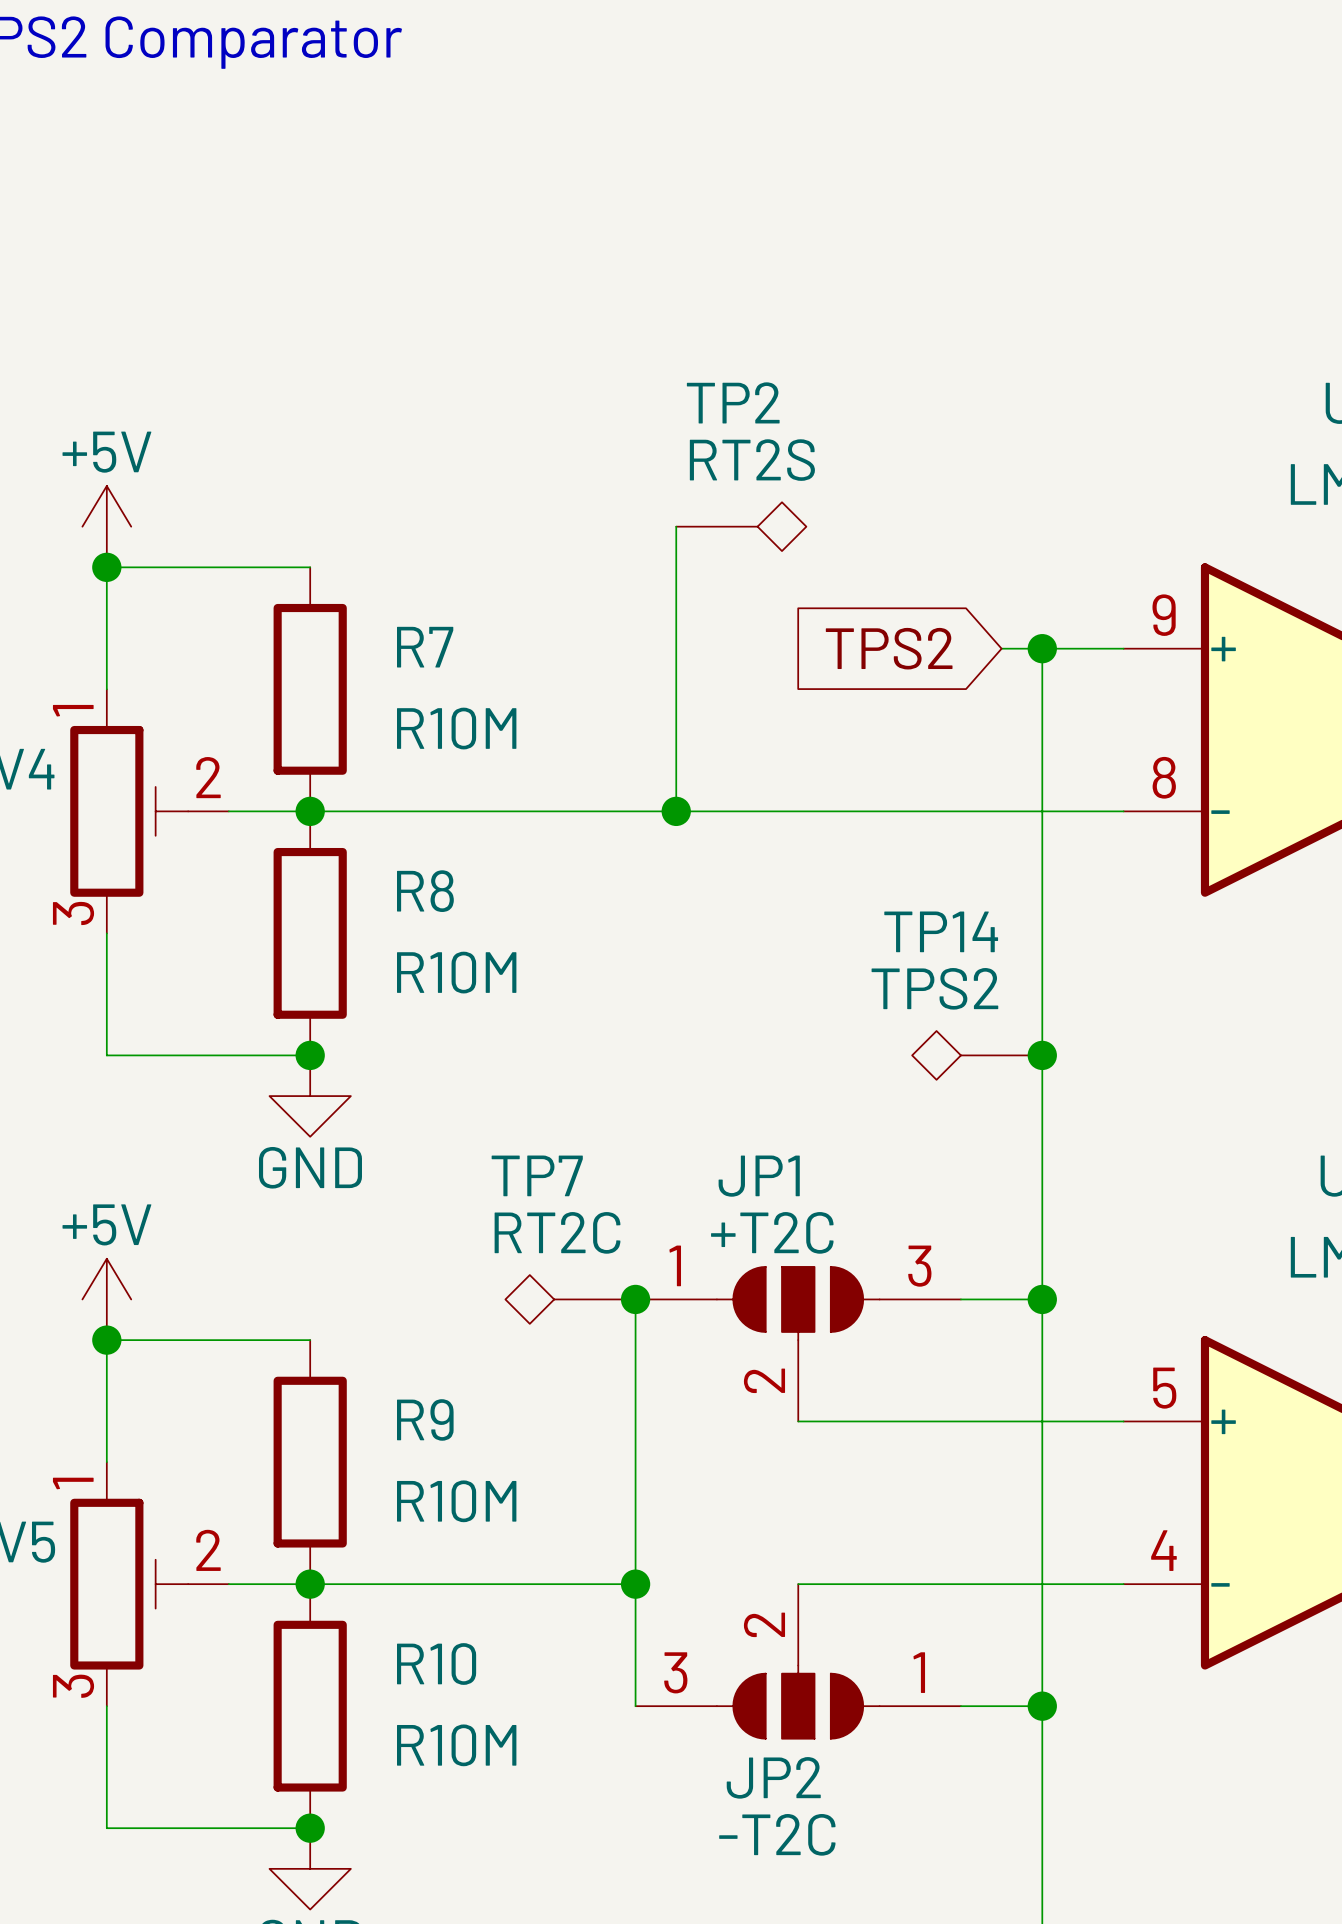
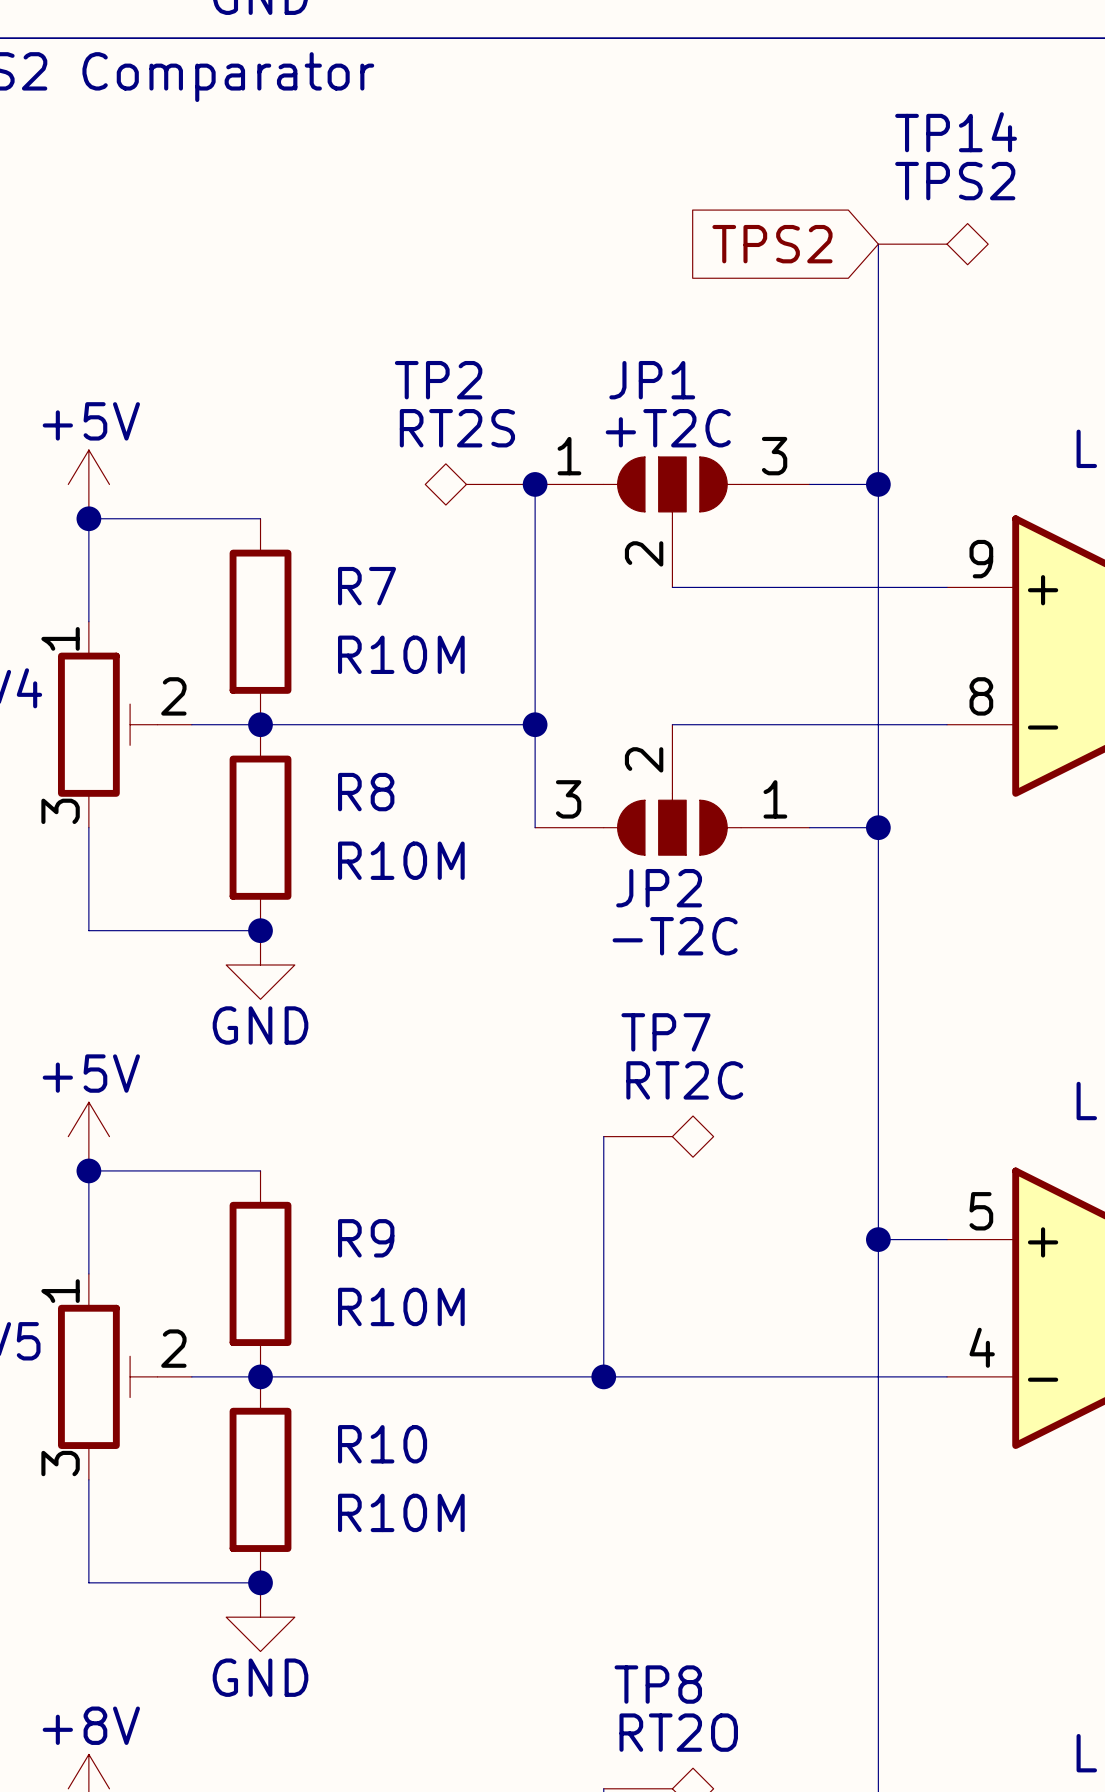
wire: none -> (878, 244) (878, 587)
junction: none -> (535, 484)
wire: (676, 526) (676, 811) -> (603, 1136) (603, 1376)
TP2 position: (741, 526) -> (480, 484)
TP2 rotation: 0° (781, 526) -> 180° (445, 484)
wire: none -> (672, 587) (844, 587)
global label position: TPS2 (889, 648) -> TPS2 (772, 244)
junction position: (1042, 648) -> (878, 484)
wire: (635, 811) (798, 811) -> (535, 1376) (672, 1376)
junction position: (676, 811) -> (535, 724)
TP14 name position: TP14 (941, 931) -> TP14 (956, 132)
TP14 text position: TPS2 (934, 988) -> TPS2 (955, 181)
TP14 rotation: 0° (936, 1055) -> 180° (967, 244)
TP14 position: (977, 1055) -> (933, 244)
junction position: (1042, 1055) -> (878, 827)
TP7 rotation: 0° (529, 1299) -> 180° (693, 1136)
TP7 position: (570, 1299) -> (658, 1136)
wire: (635, 1299) (635, 1706) -> (535, 484) (535, 827)
junction: (635, 1299) -> none
wire: (960, 1299) (1042, 1299) -> (809, 484) (878, 484)
junction position: (1042, 1299) -> (878, 1239)
JP1 position: (798, 1344) -> (672, 522)
wire: (798, 1421) (1042, 1421) -> none
junction position: (635, 1584) -> (603, 1376)
JP2 position: (798, 1661) -> (672, 789)
wire: (960, 1706) (1042, 1706) -> (809, 827) (878, 827)
junction: (1042, 1706) -> none

